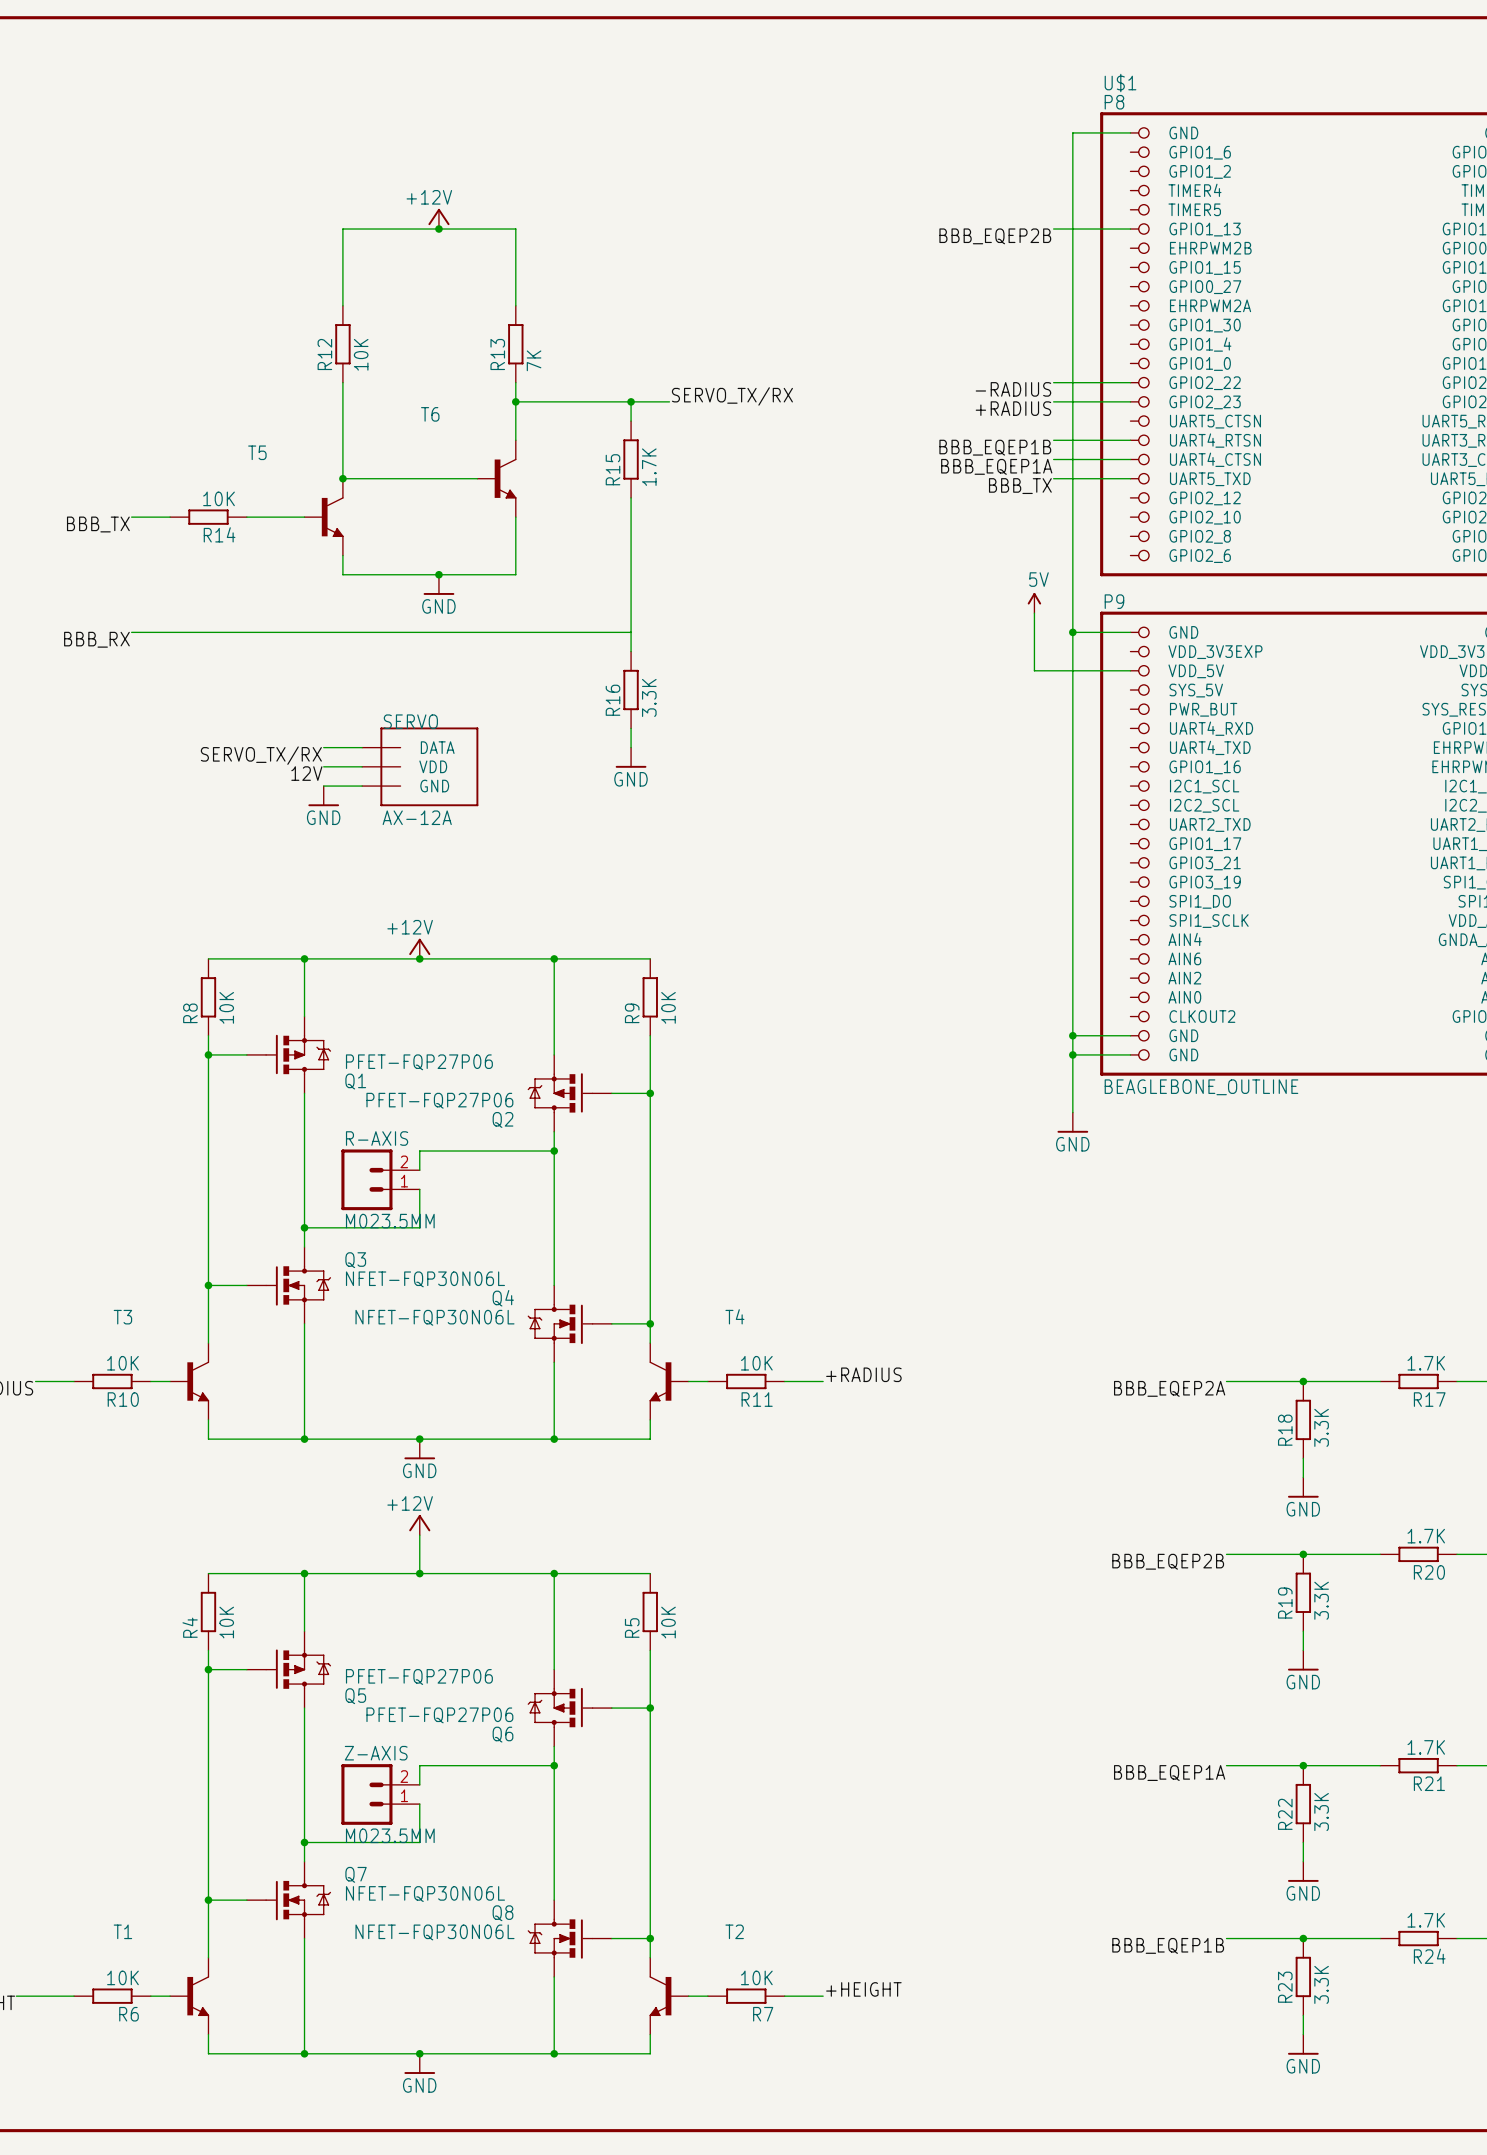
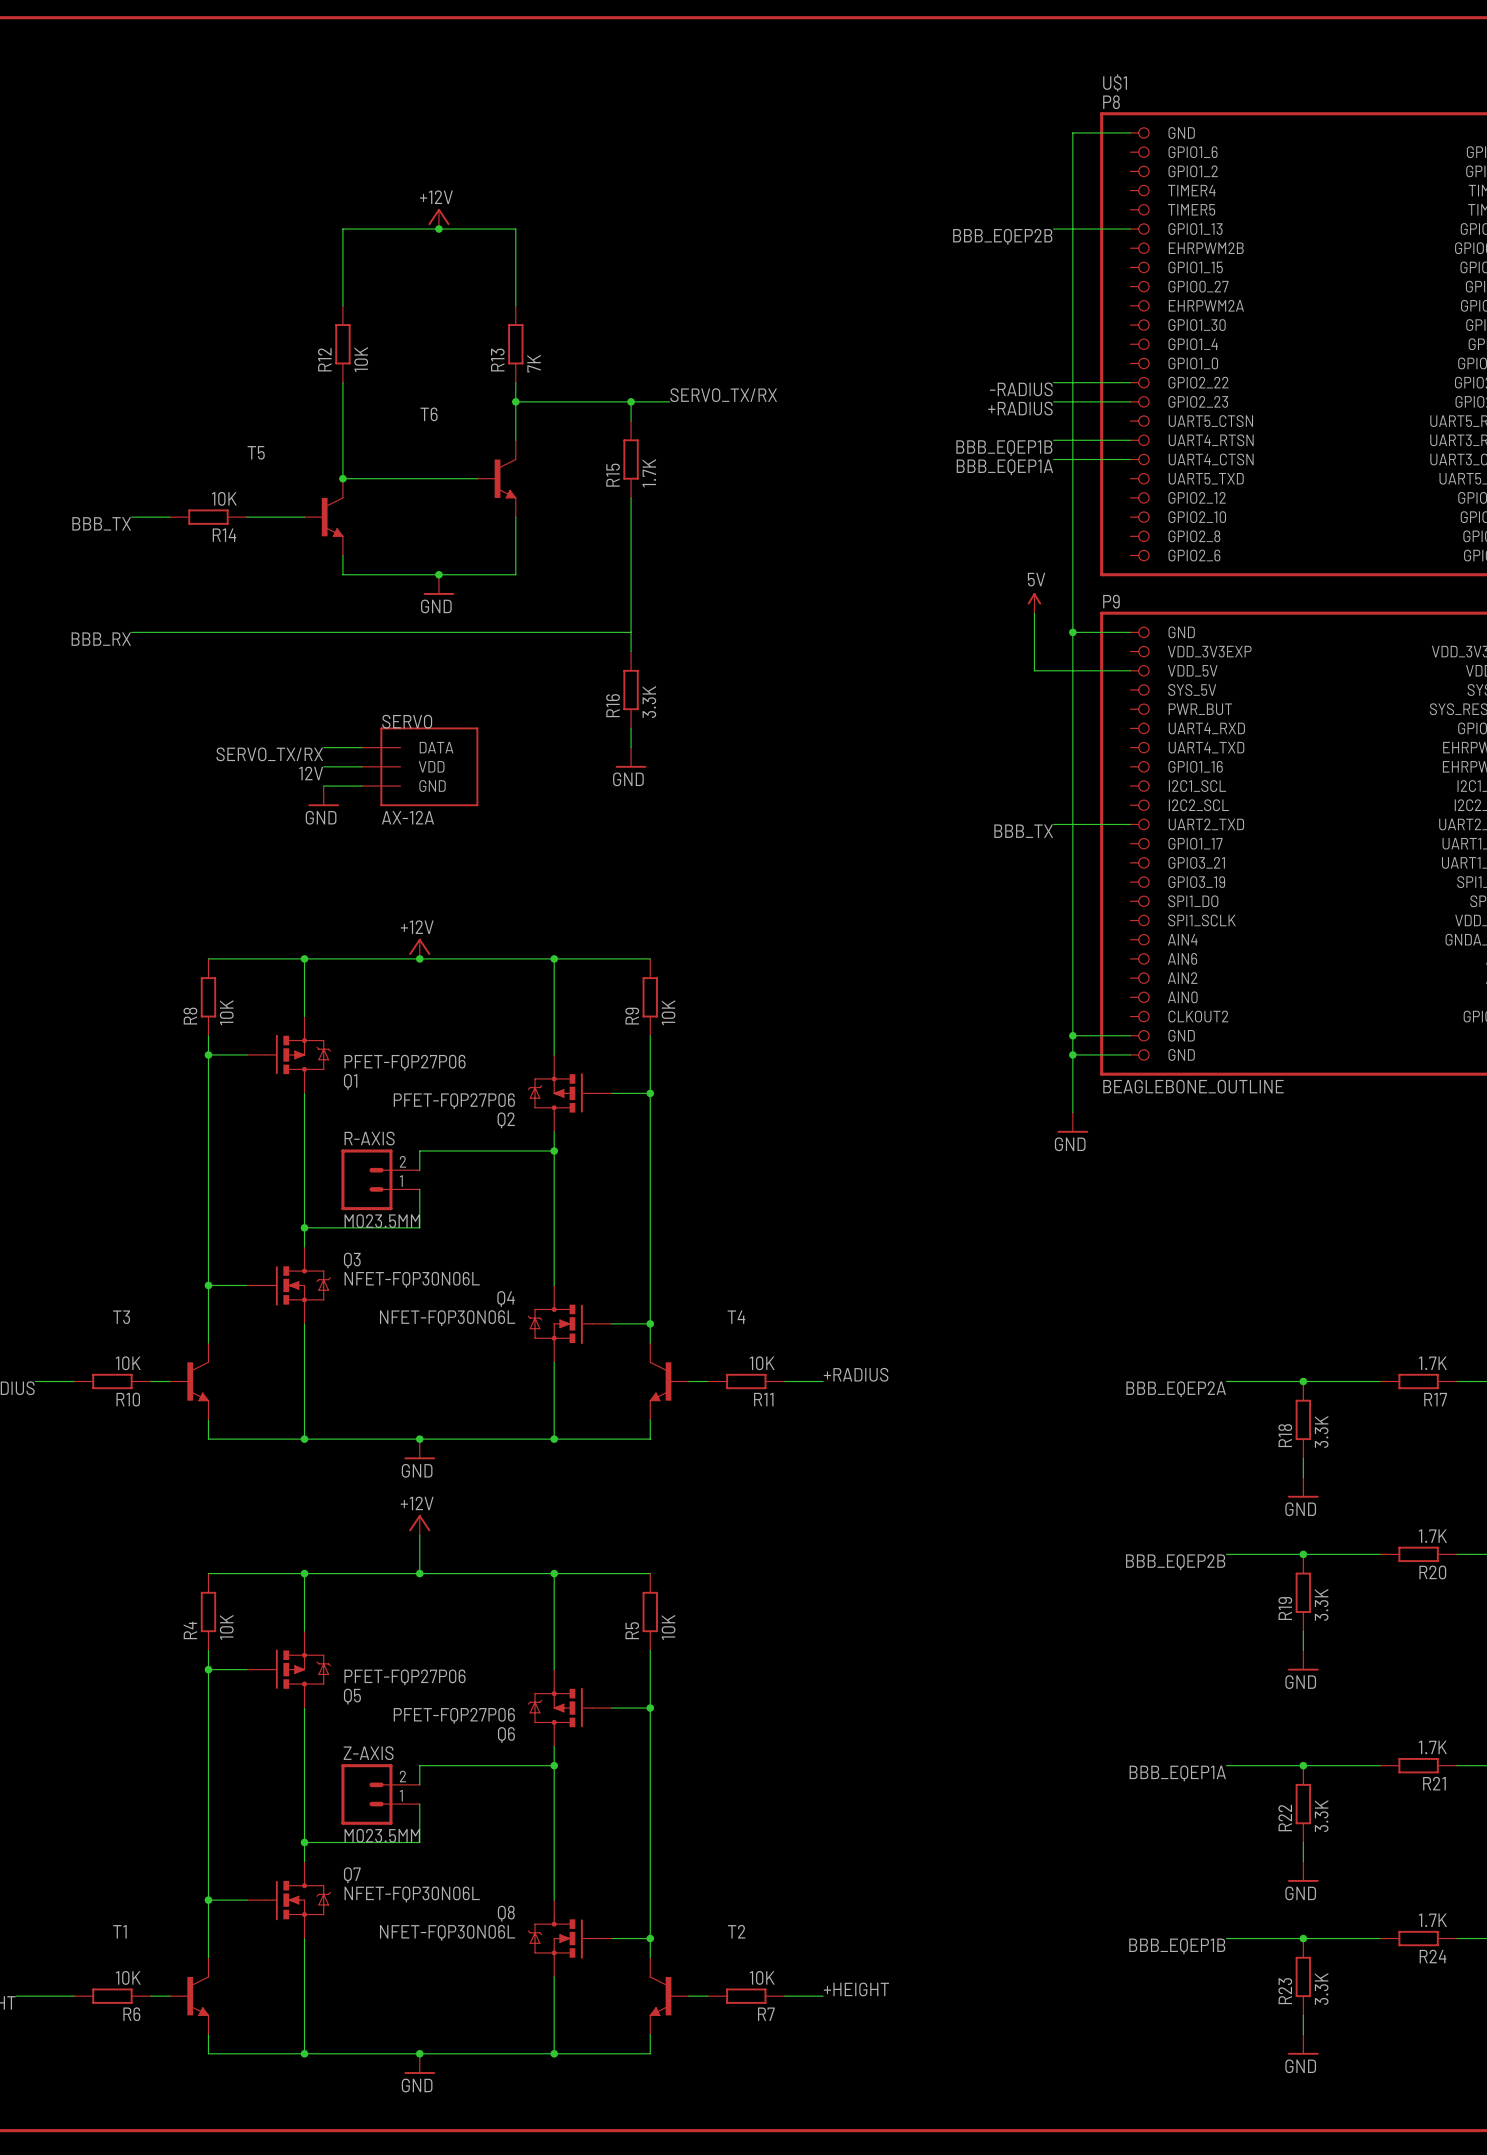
wire: (1053, 478) (1130, 478) -> none
label: BBB_TX (1020, 486) -> none
wire: none -> (1053, 824) (1130, 824)
label: none -> BBB_TX (1023, 831)

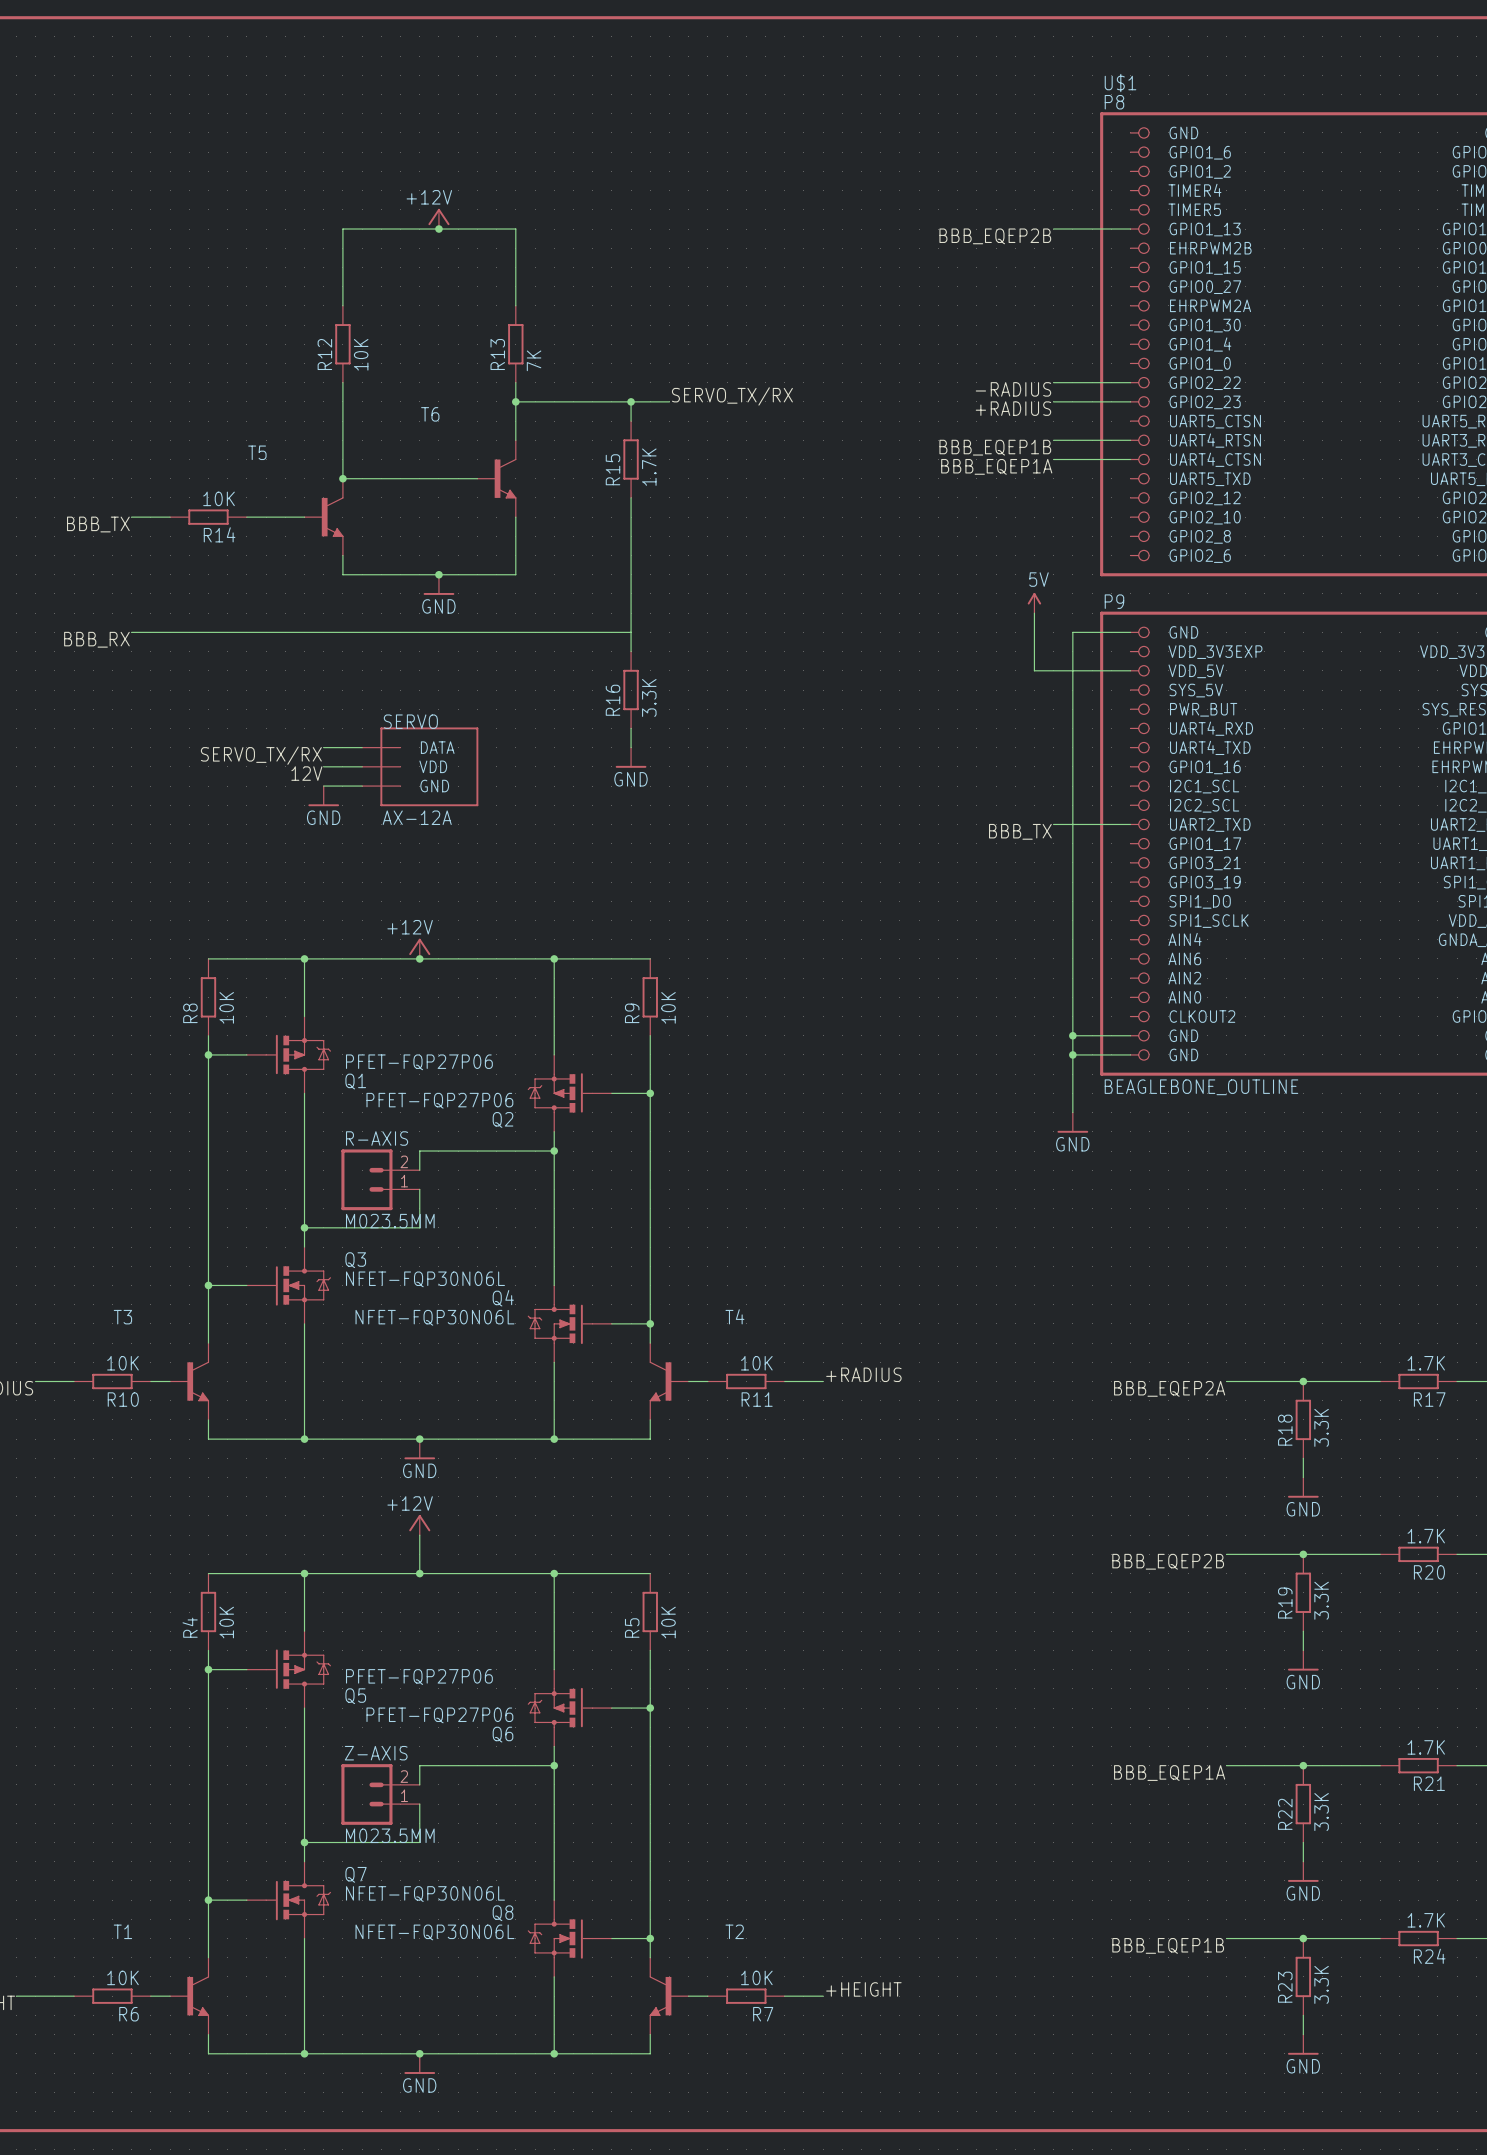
wire: (1130, 132) (1072, 132) (1072, 632) -> none
junction: (1072, 632) -> none

